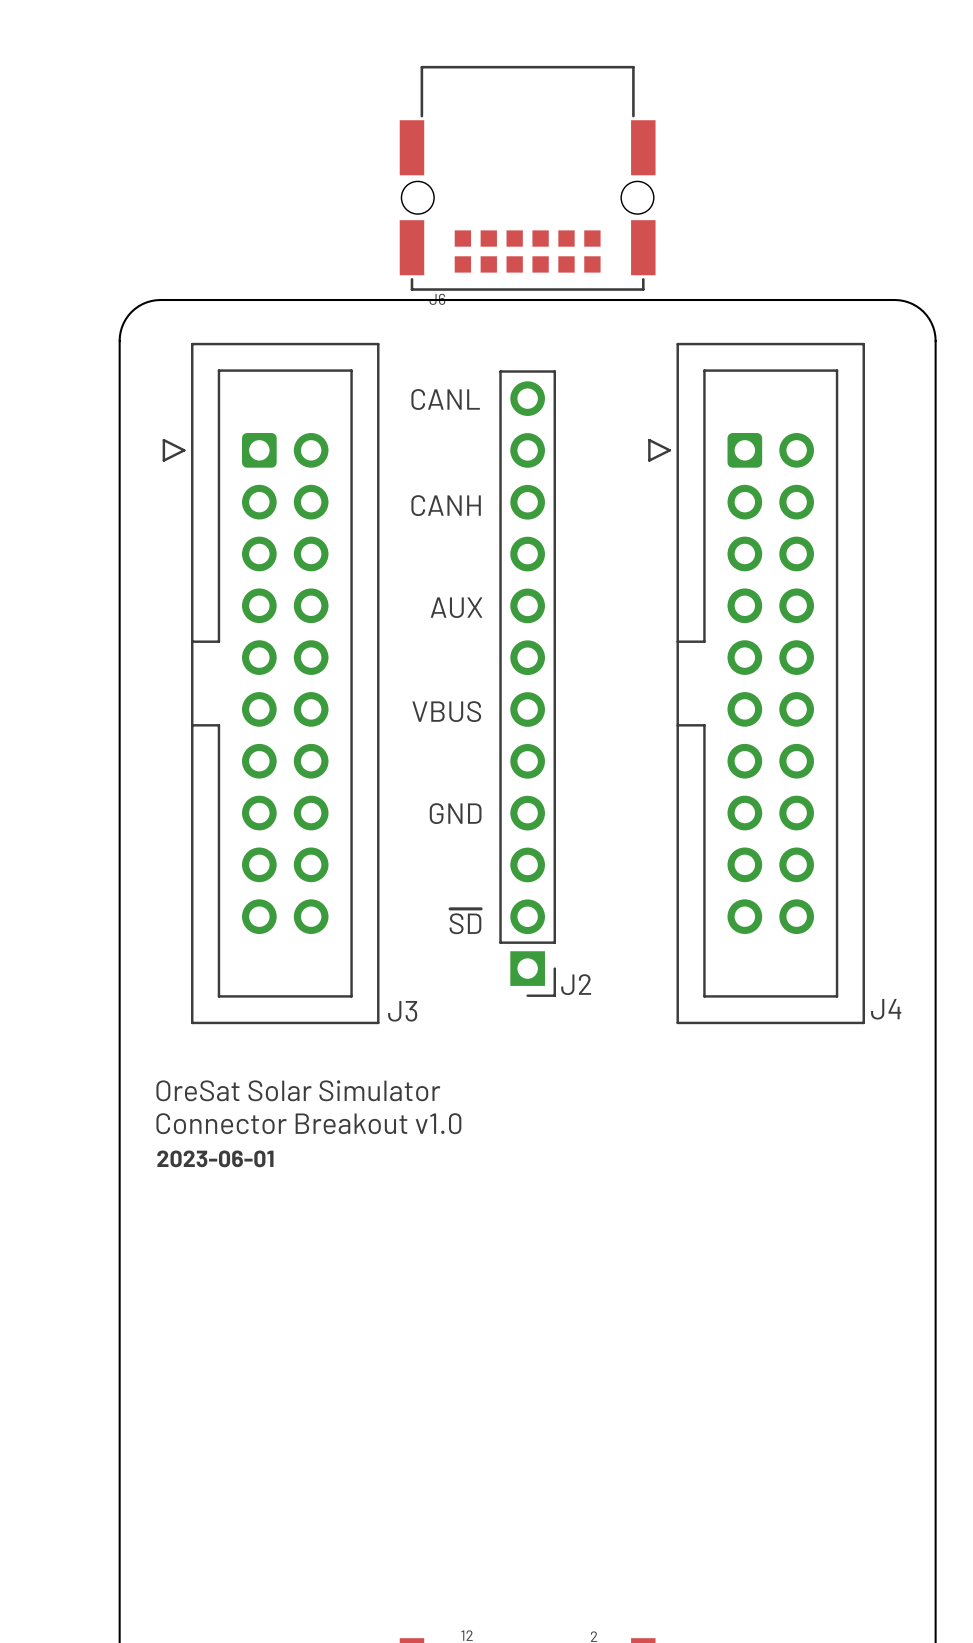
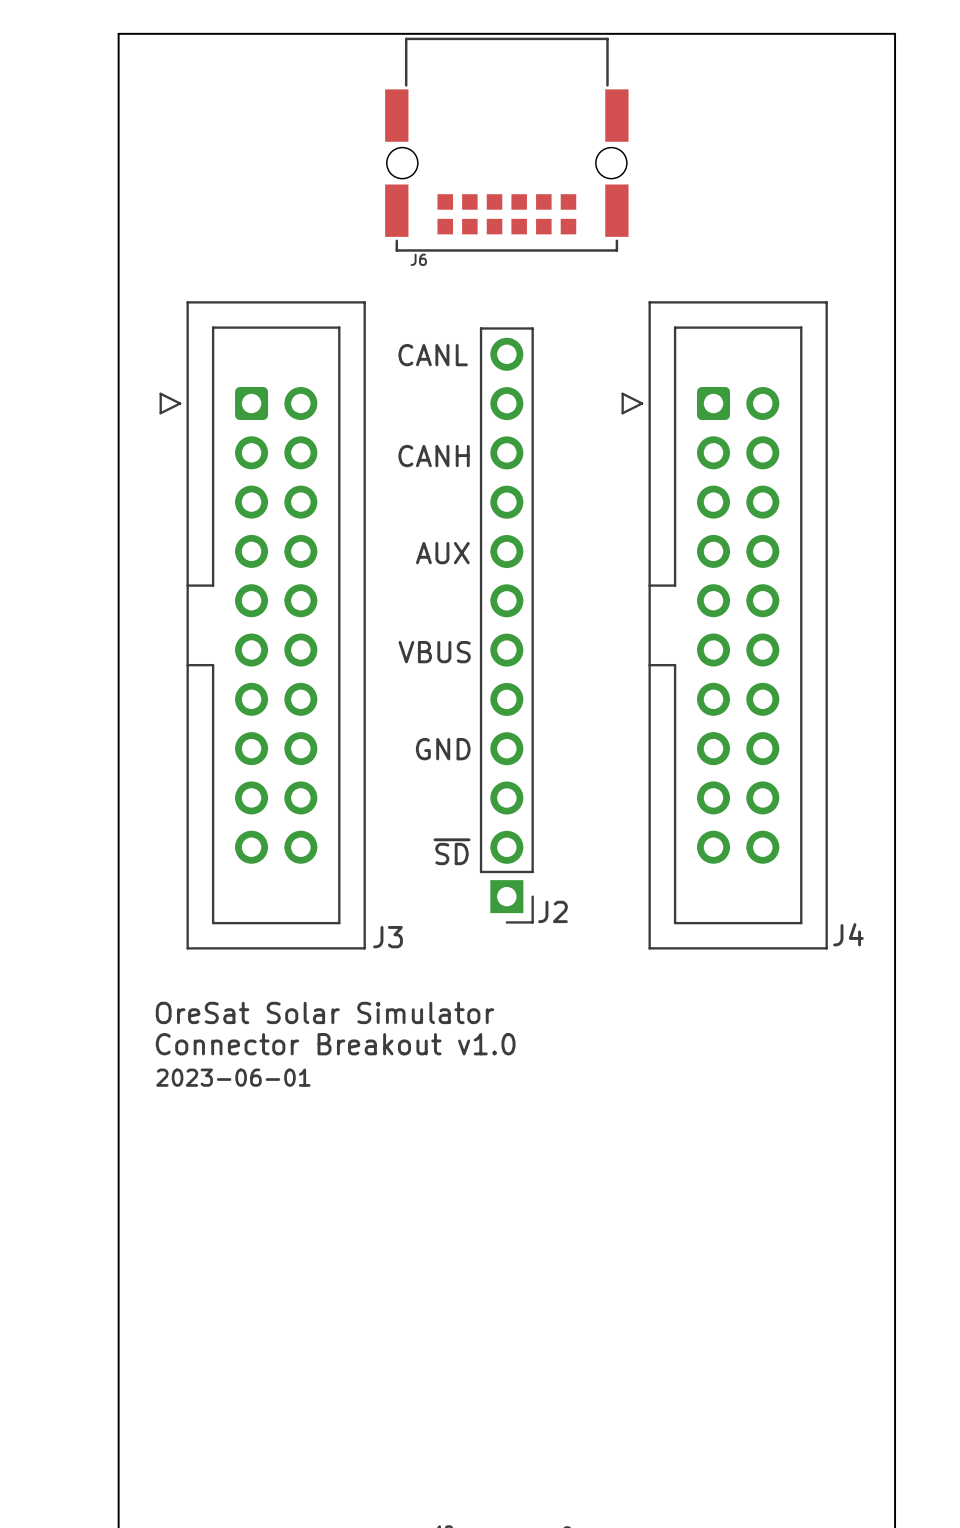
board edge: (119, 340) (121, 327) (131, 311) (146, 302) (160, 300) (894, 300) (908, 302) (923, 311) (933, 327) (935, 340) -> (118, 299) (118, 33) (895, 33) (895, 299)

